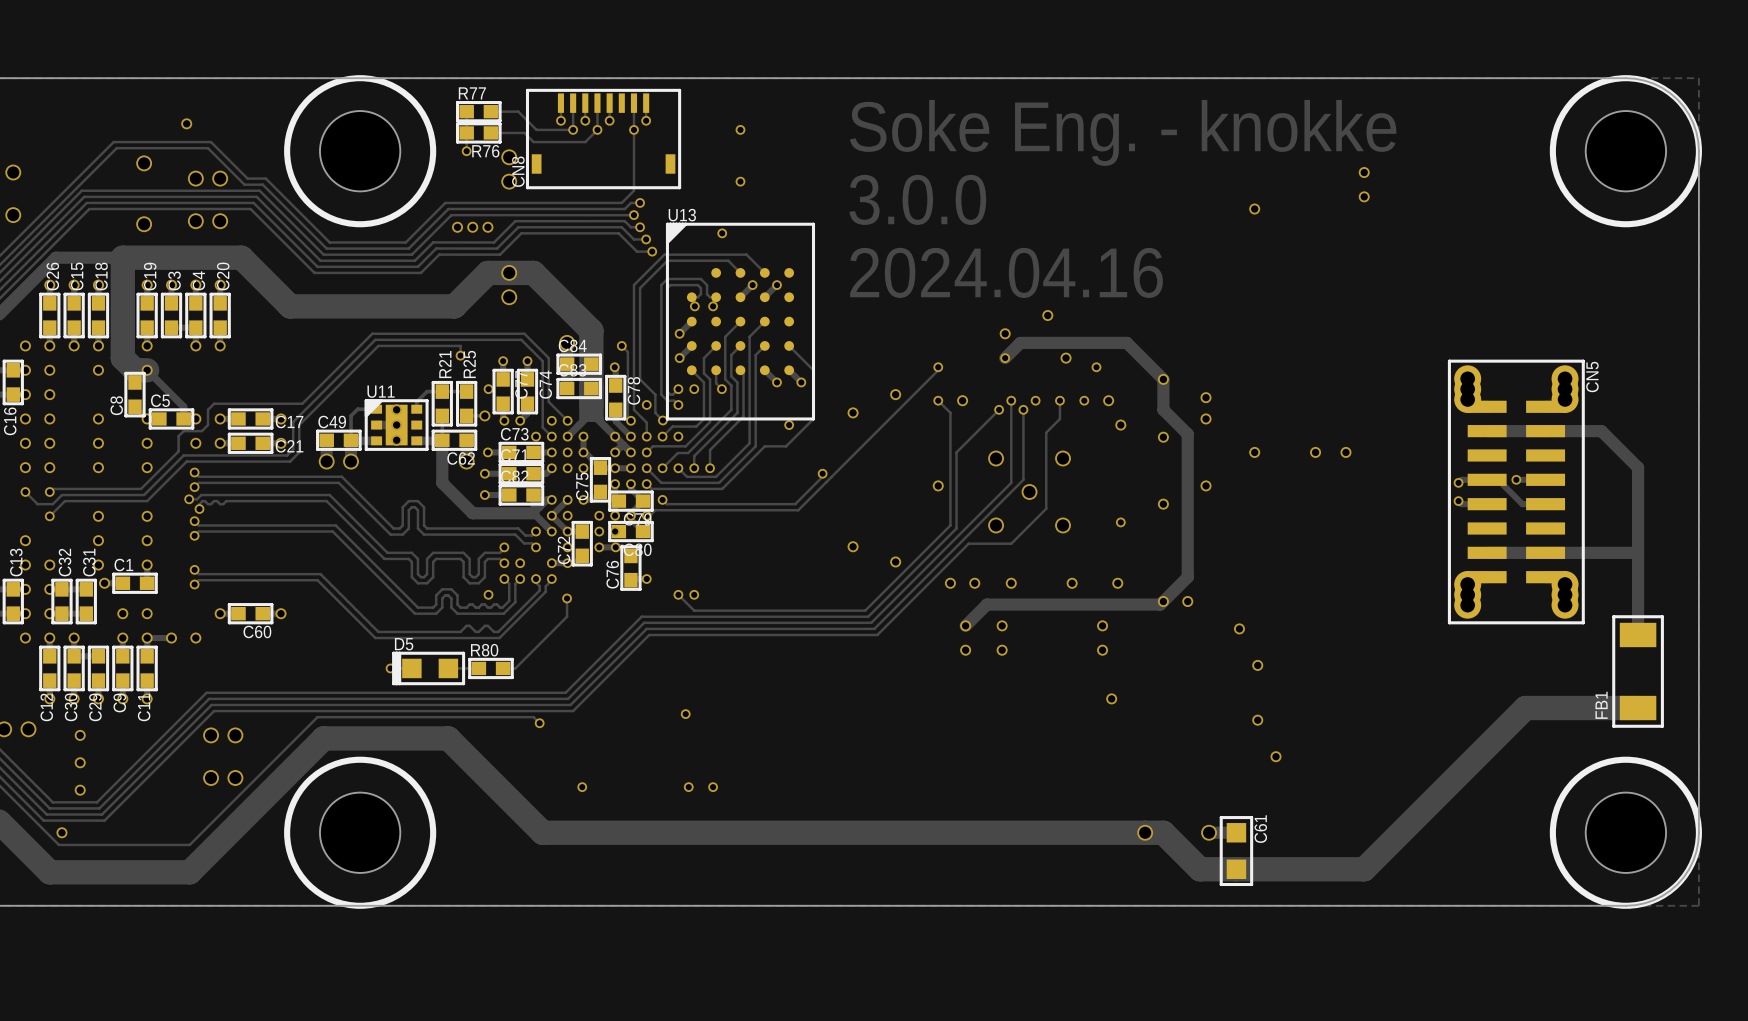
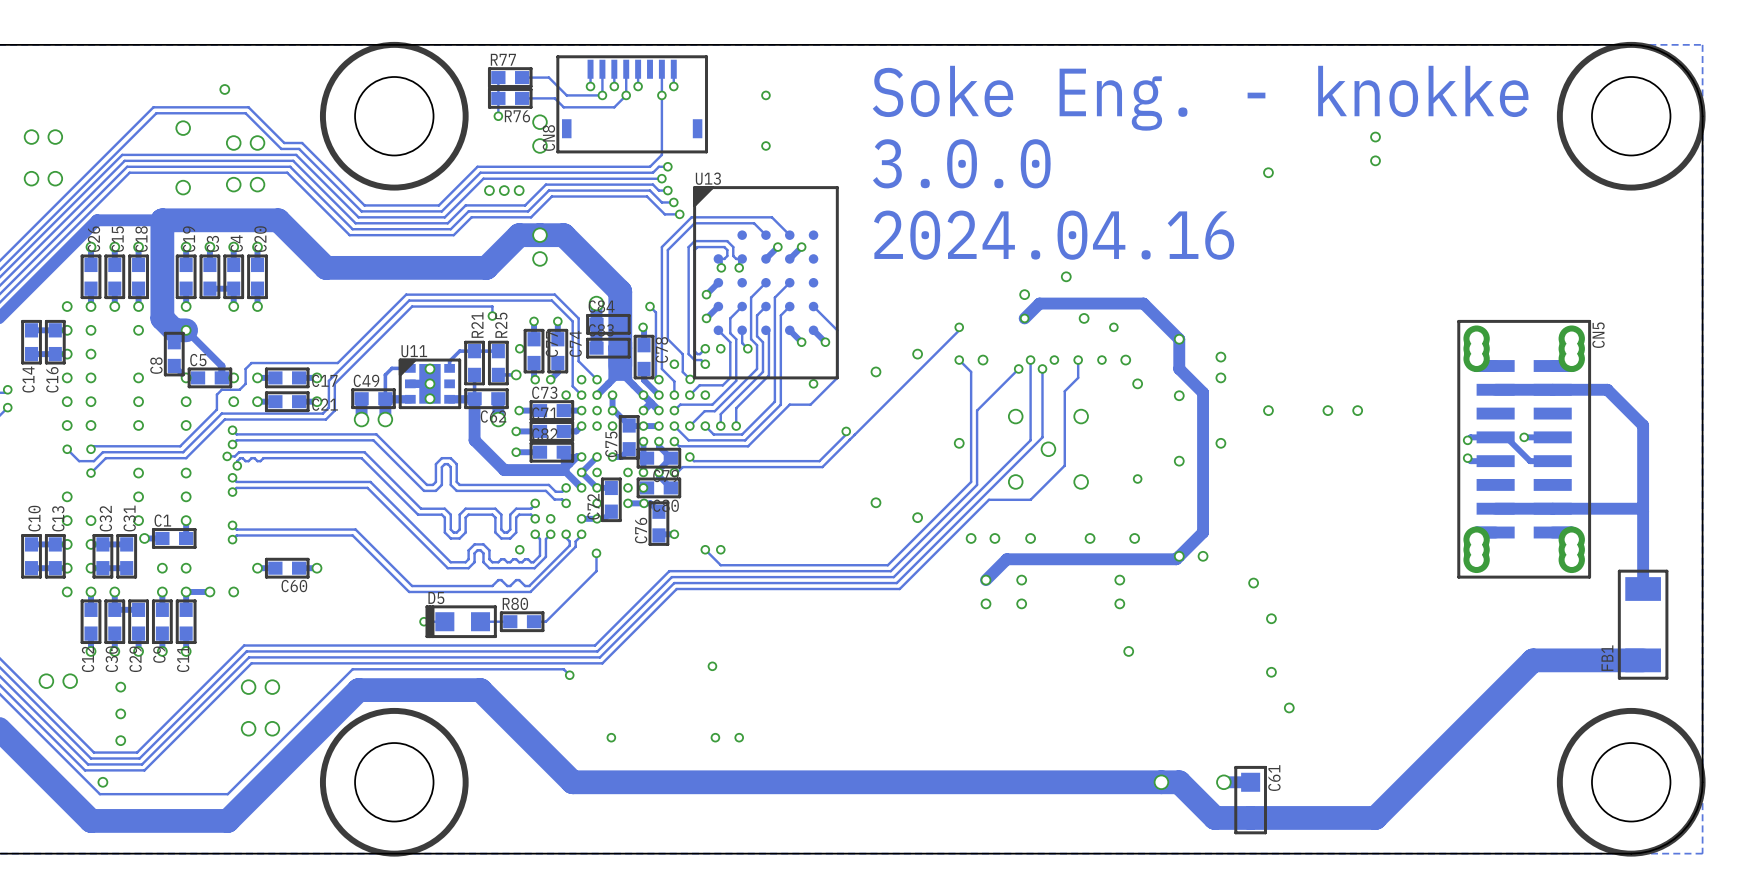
via: (722, 233) -> none

